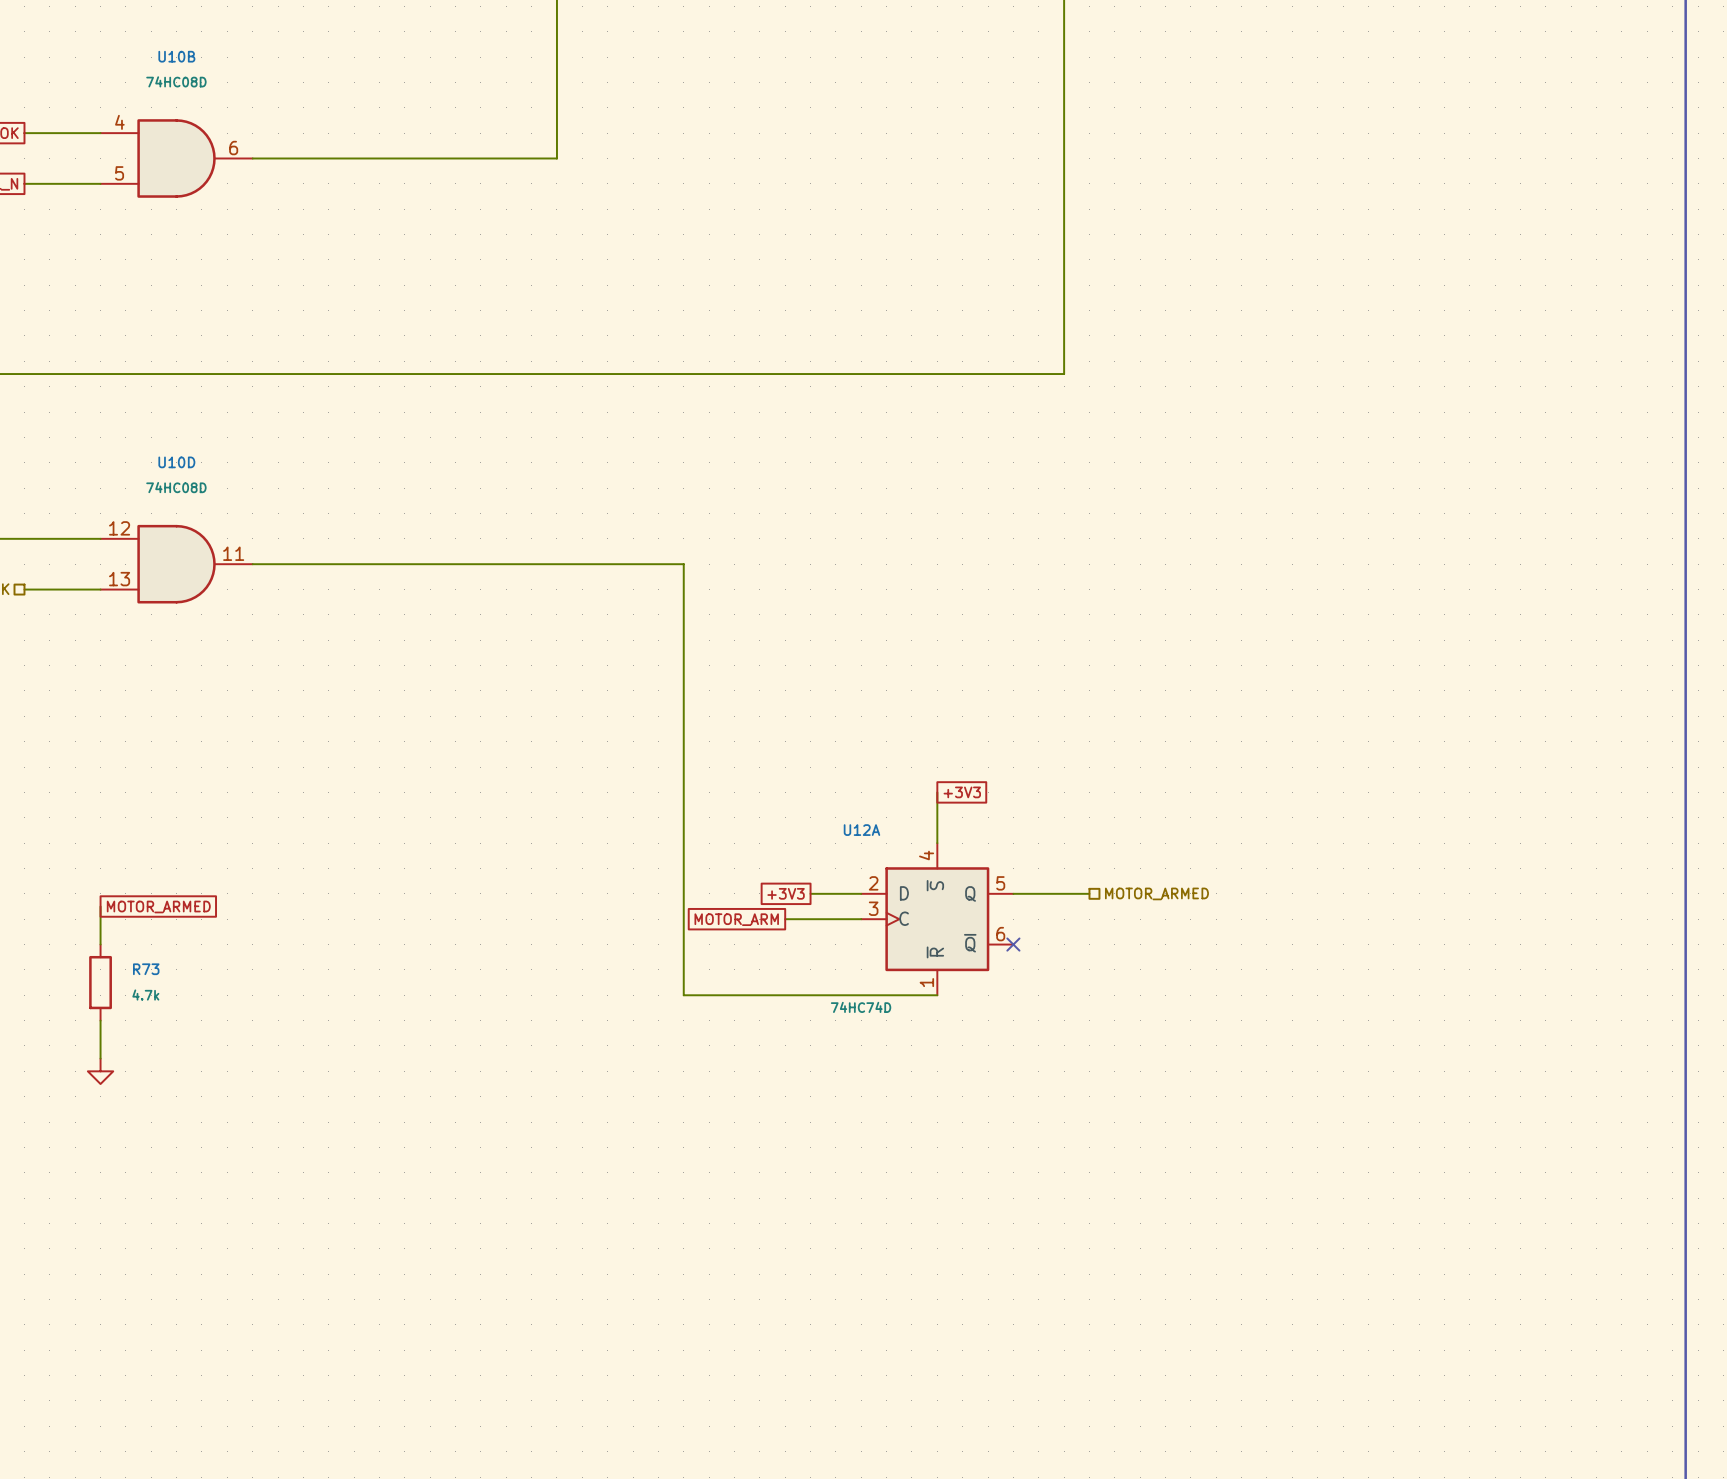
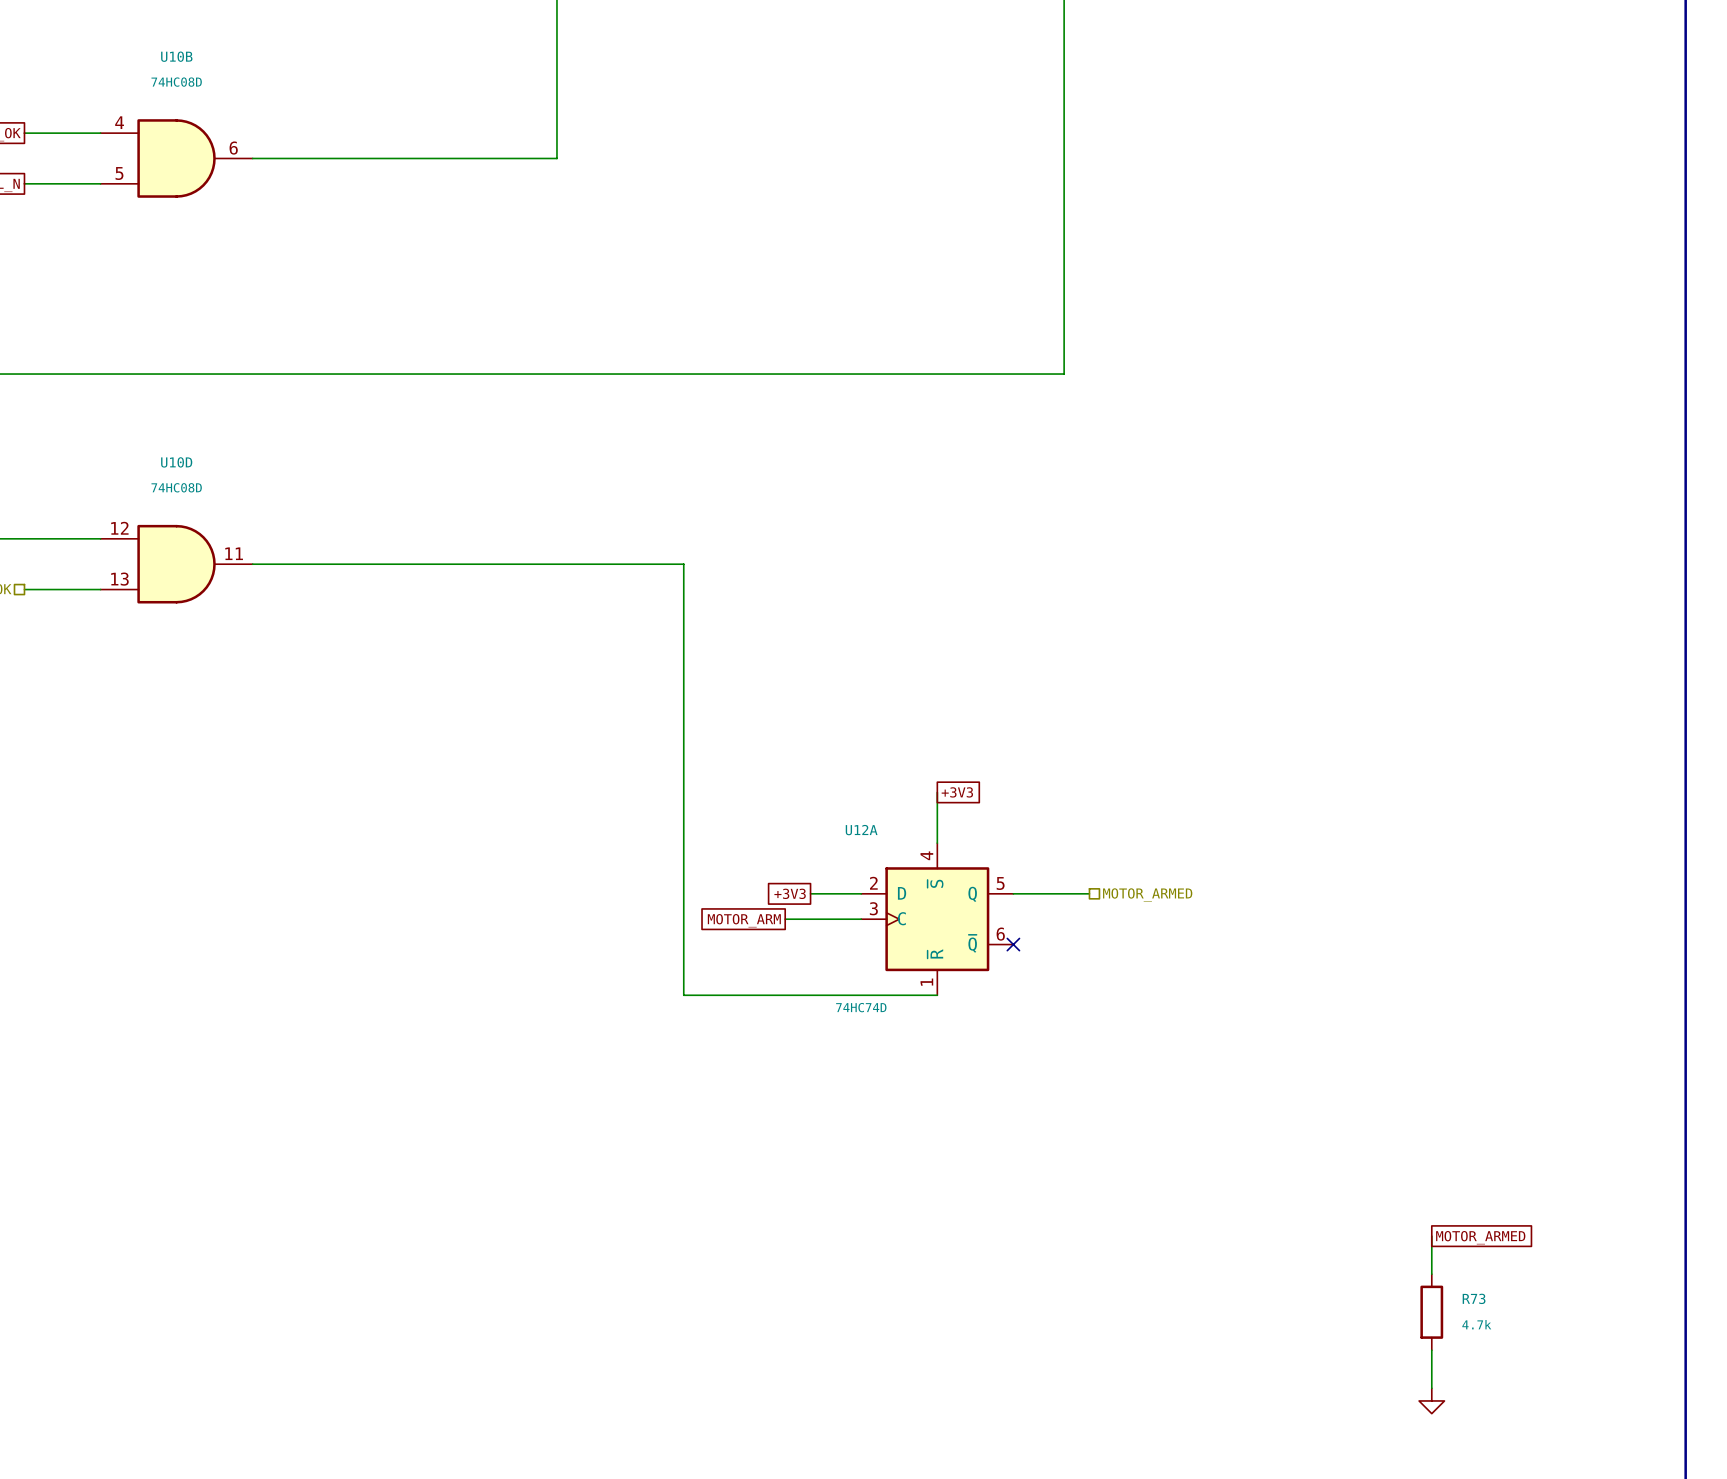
wire: (100, 906) (100, 944) -> none
global label: MOTOR_ARMED (158, 906) -> none
R73 position: (100, 982) -> (1431, 1312)
wire: (100, 1020) (100, 1058) -> none
power symbol: (100, 1071) -> none
wire: none -> (1431, 1236) (1431, 1274)
global label: none -> MOTOR_ARMED (1480, 1237)
wire: none -> (1431, 1350) (1431, 1388)
power symbol: none -> (1431, 1400)

